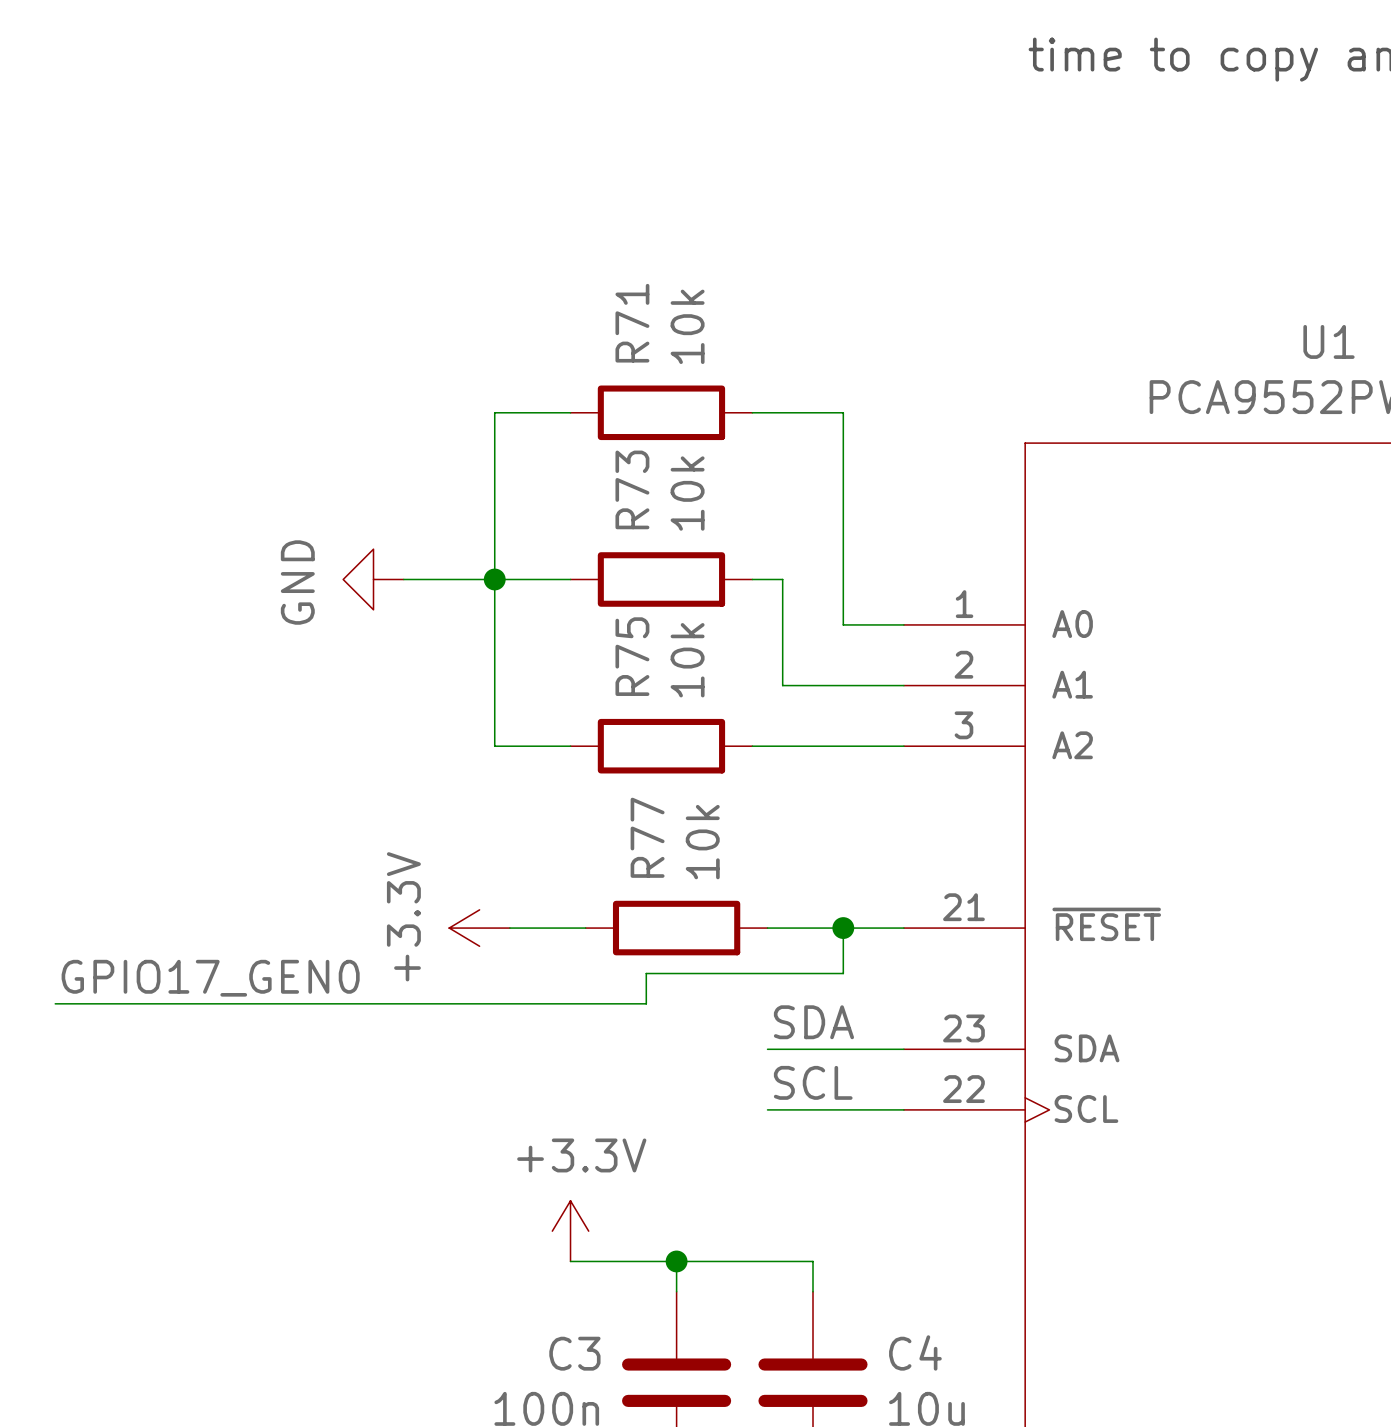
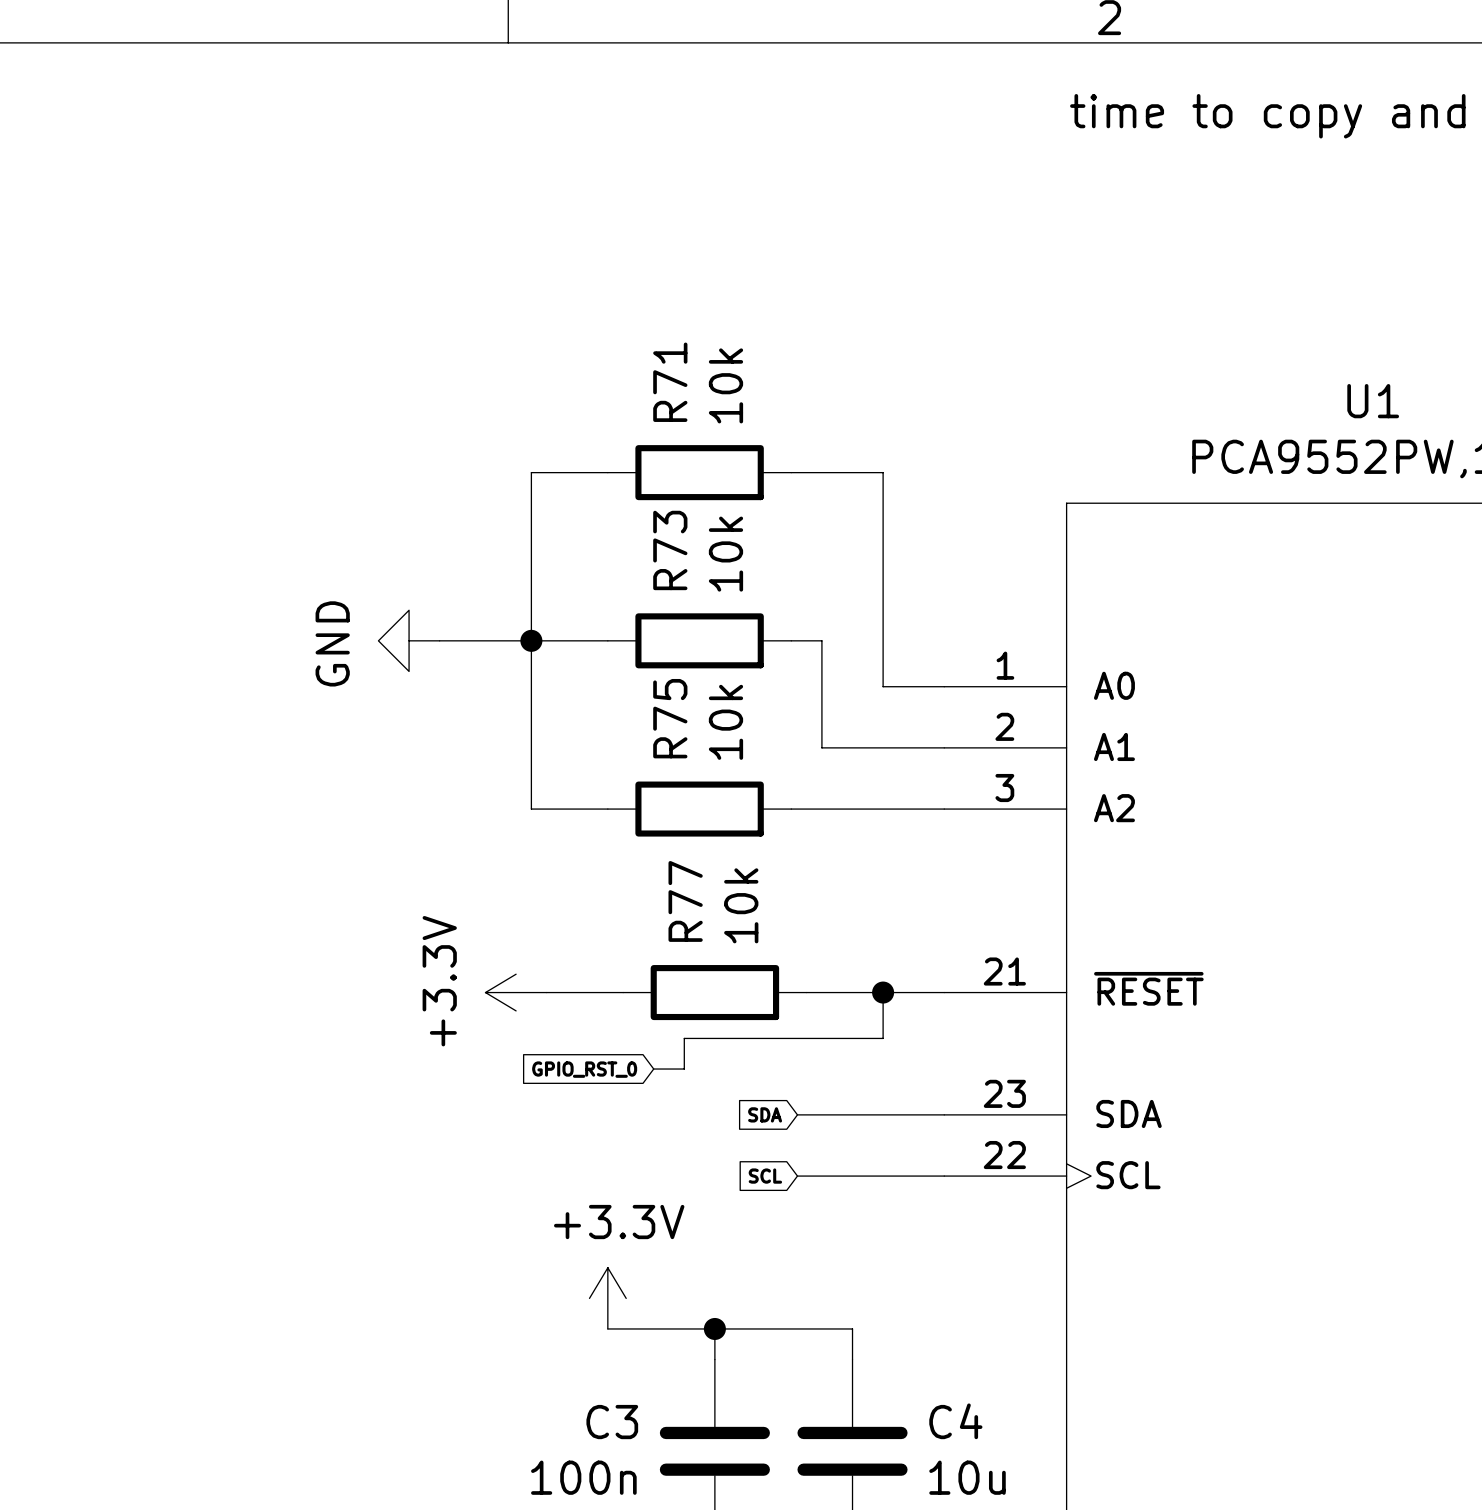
label: GPIO17_GEN0 (210, 978) -> none
wire: (55, 1003) (615, 1003) -> none
global label: none -> GPIO_RST_0 (584, 1069)
label: SDA (813, 1022) -> none
global label: none -> SDA (765, 1114)
wire: none -> (797, 1114) (806, 1114)
label: SCL (813, 1082) -> none
global label: none -> SCL (765, 1176)
wire: none -> (797, 1176) (806, 1176)

